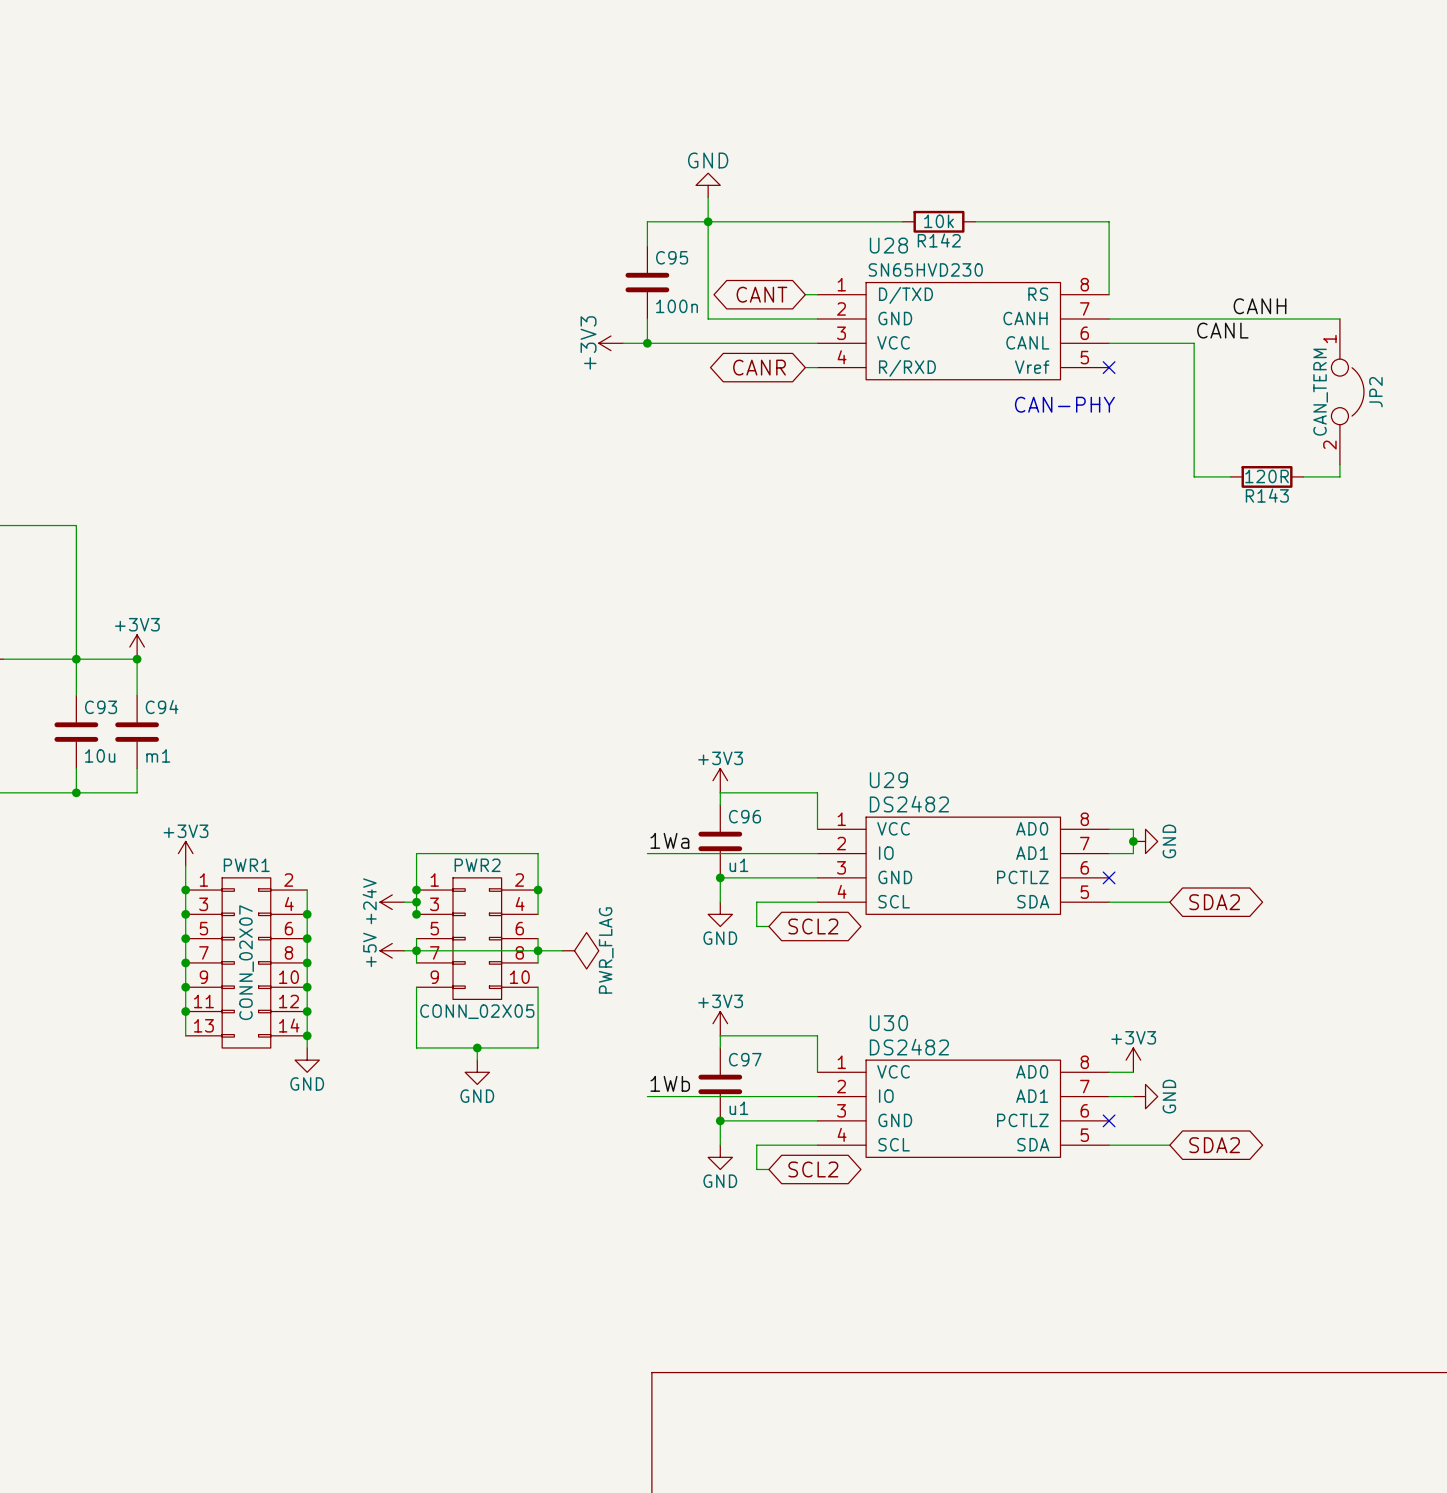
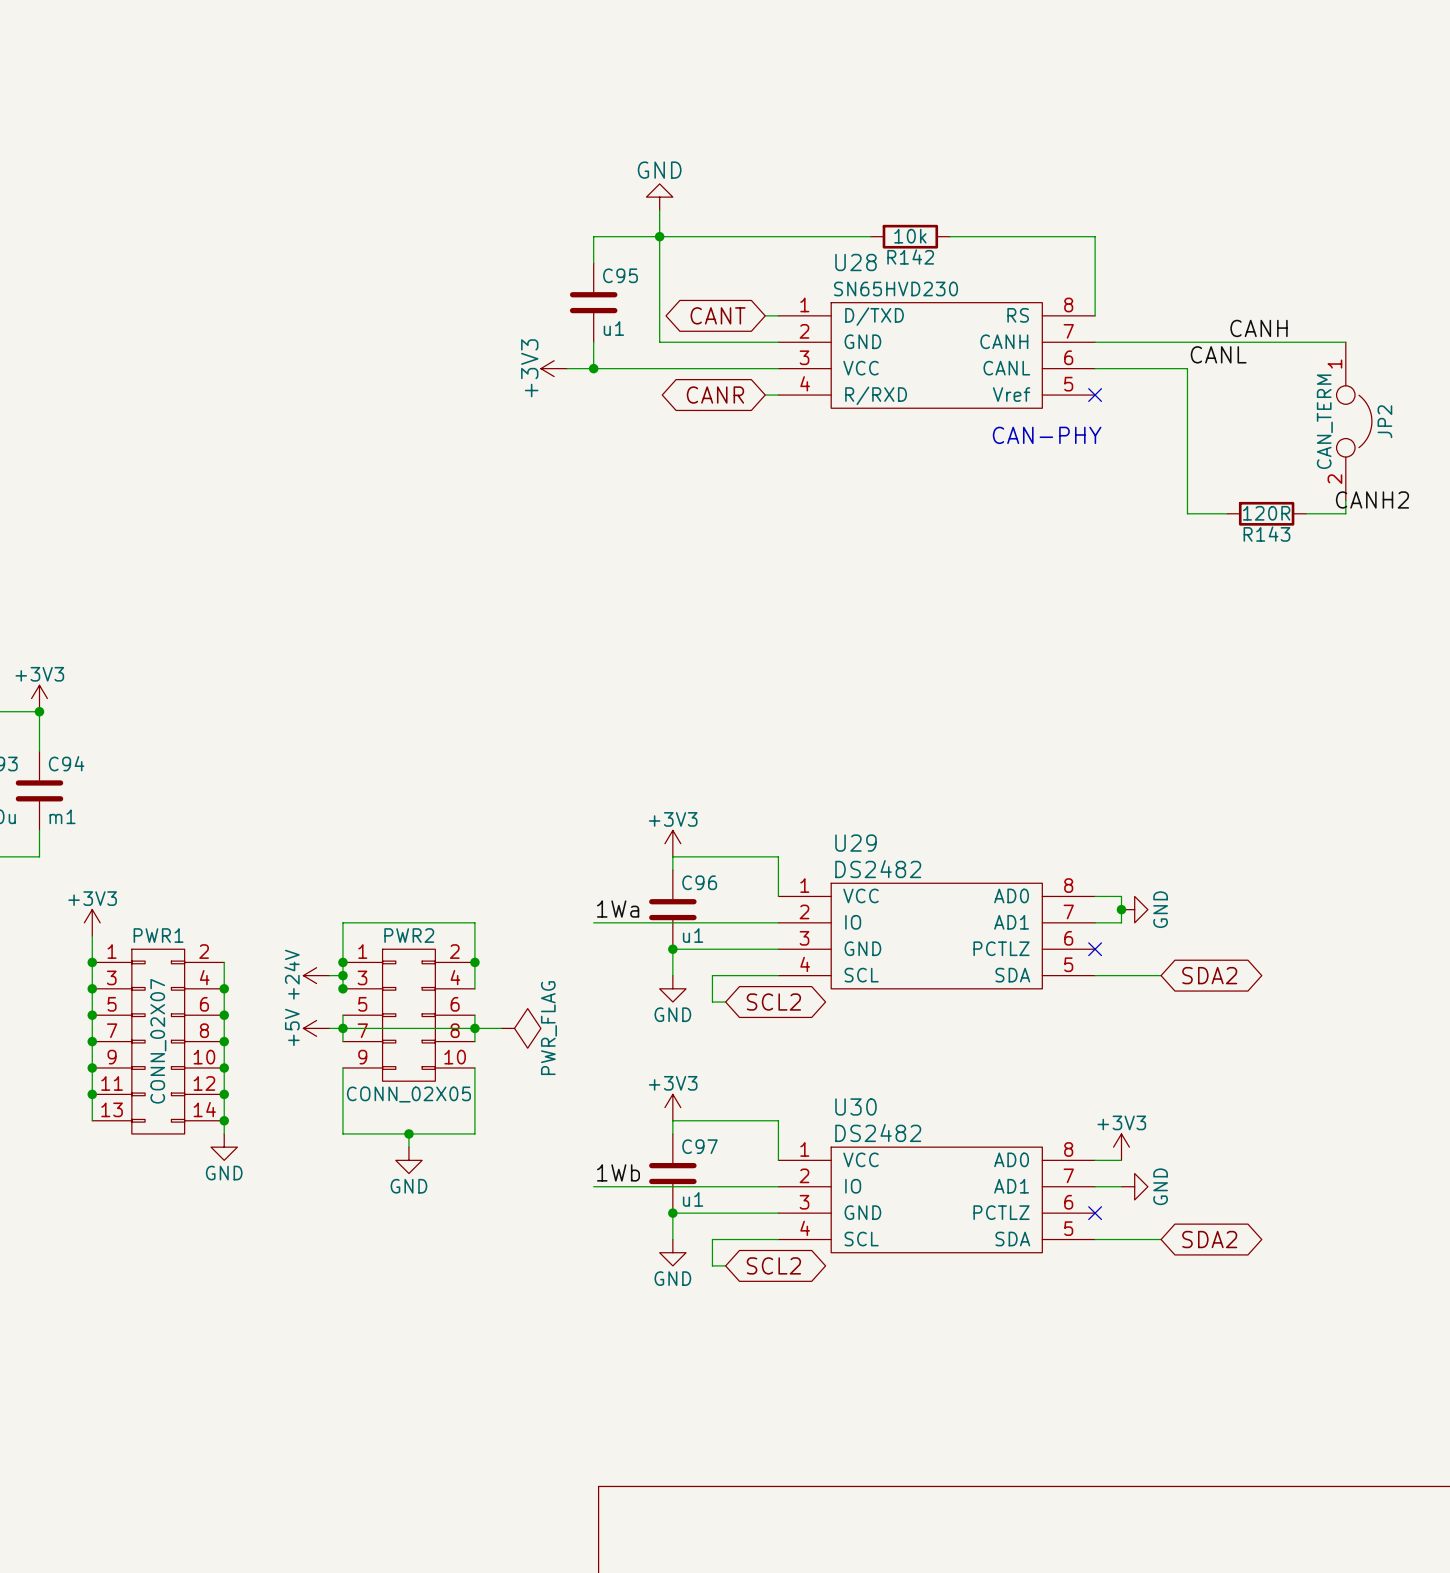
C95 value: 100n (676, 306) -> u1 (613, 328)
label: none -> CANH2 (1372, 499)

